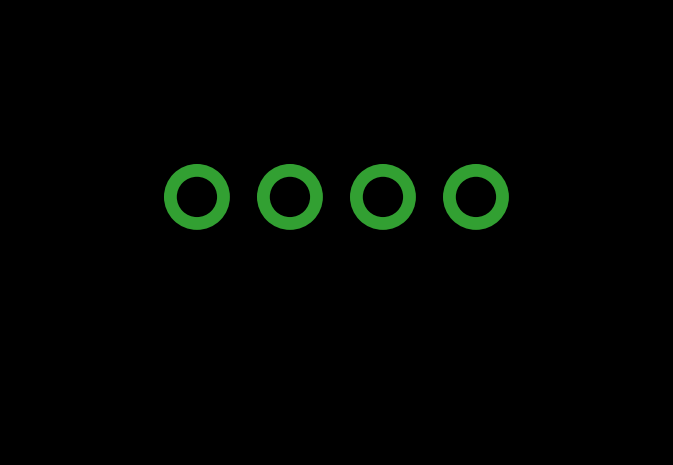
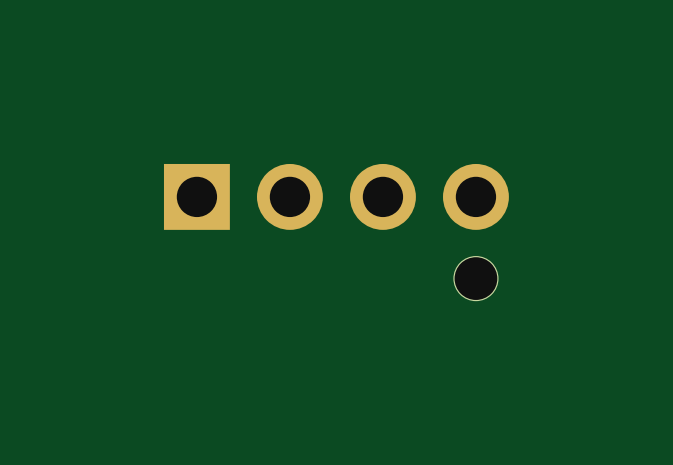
part footprint: [163, 163, 509, 230] -> [163, 163, 509, 301]

